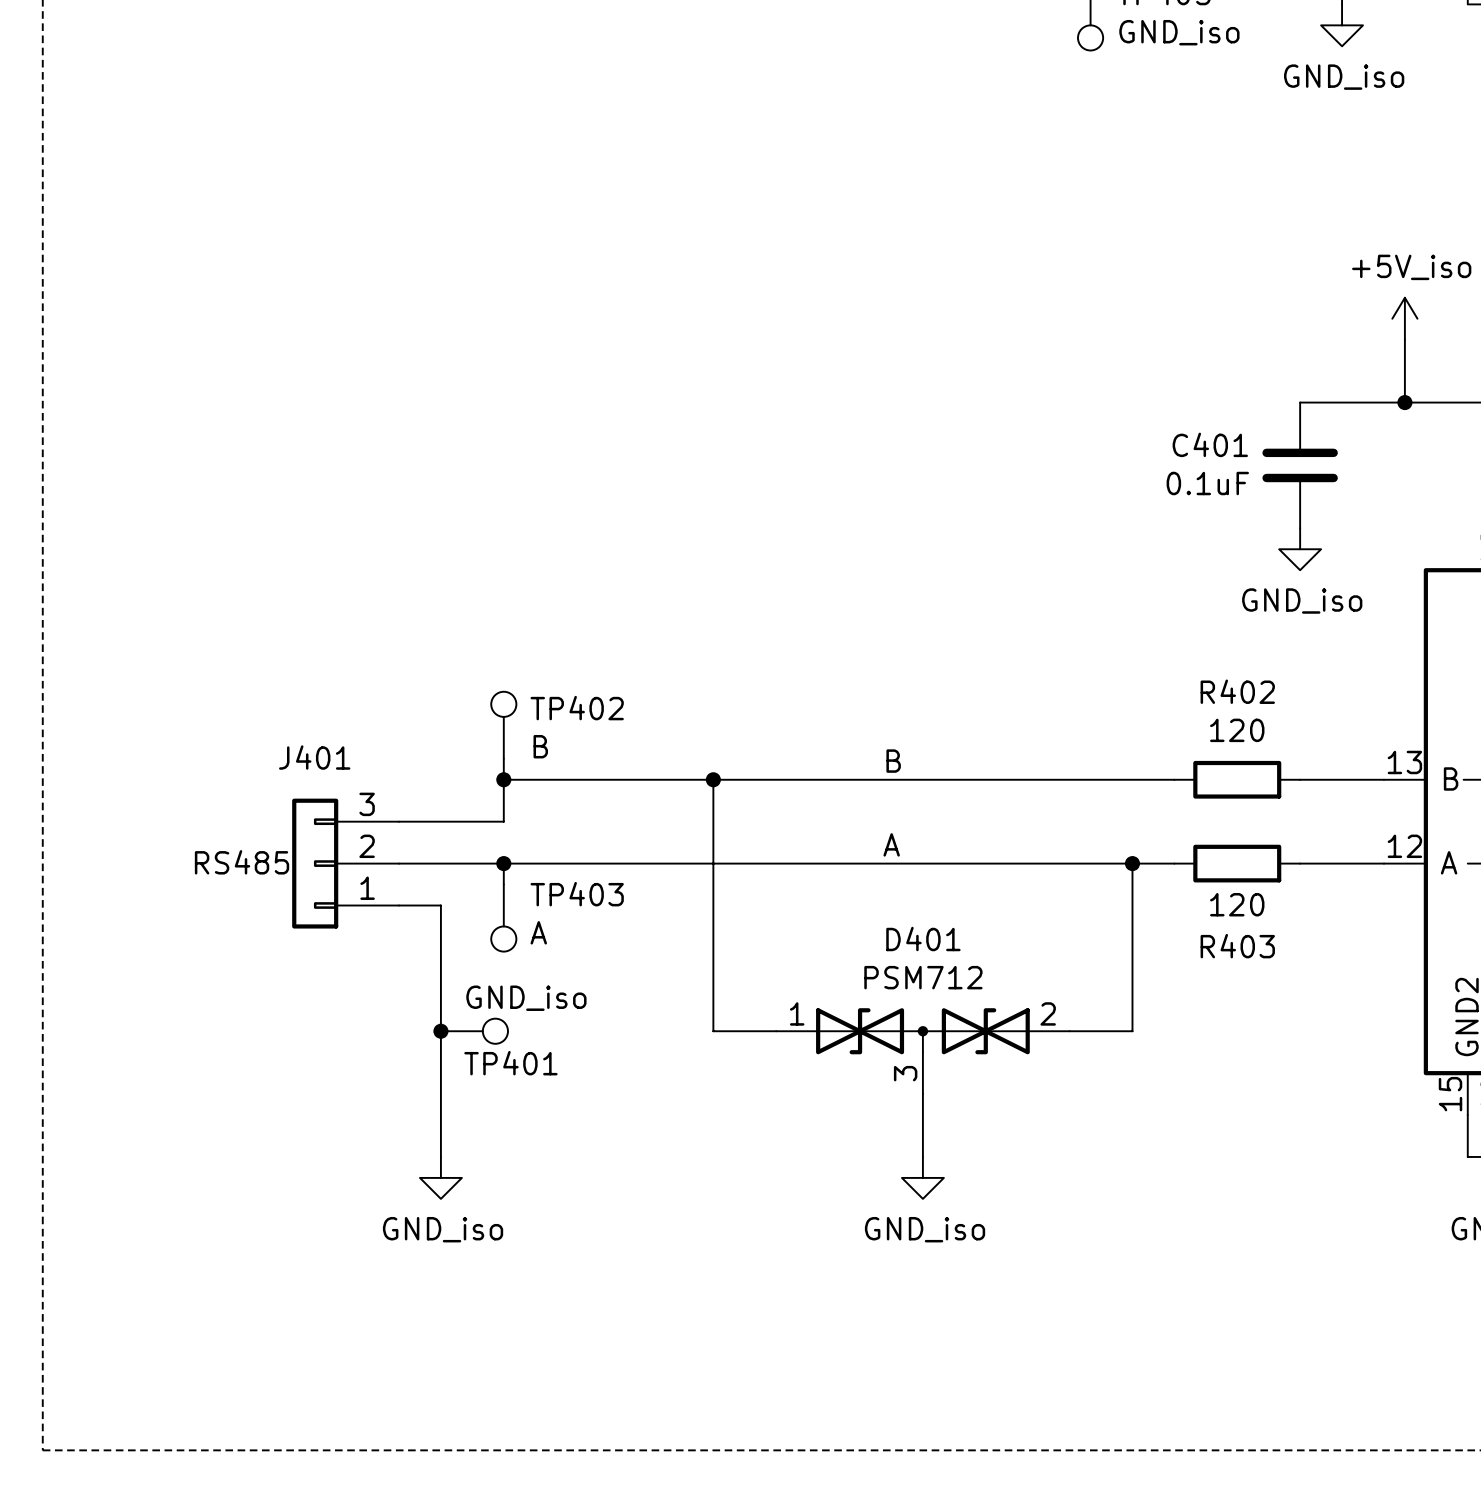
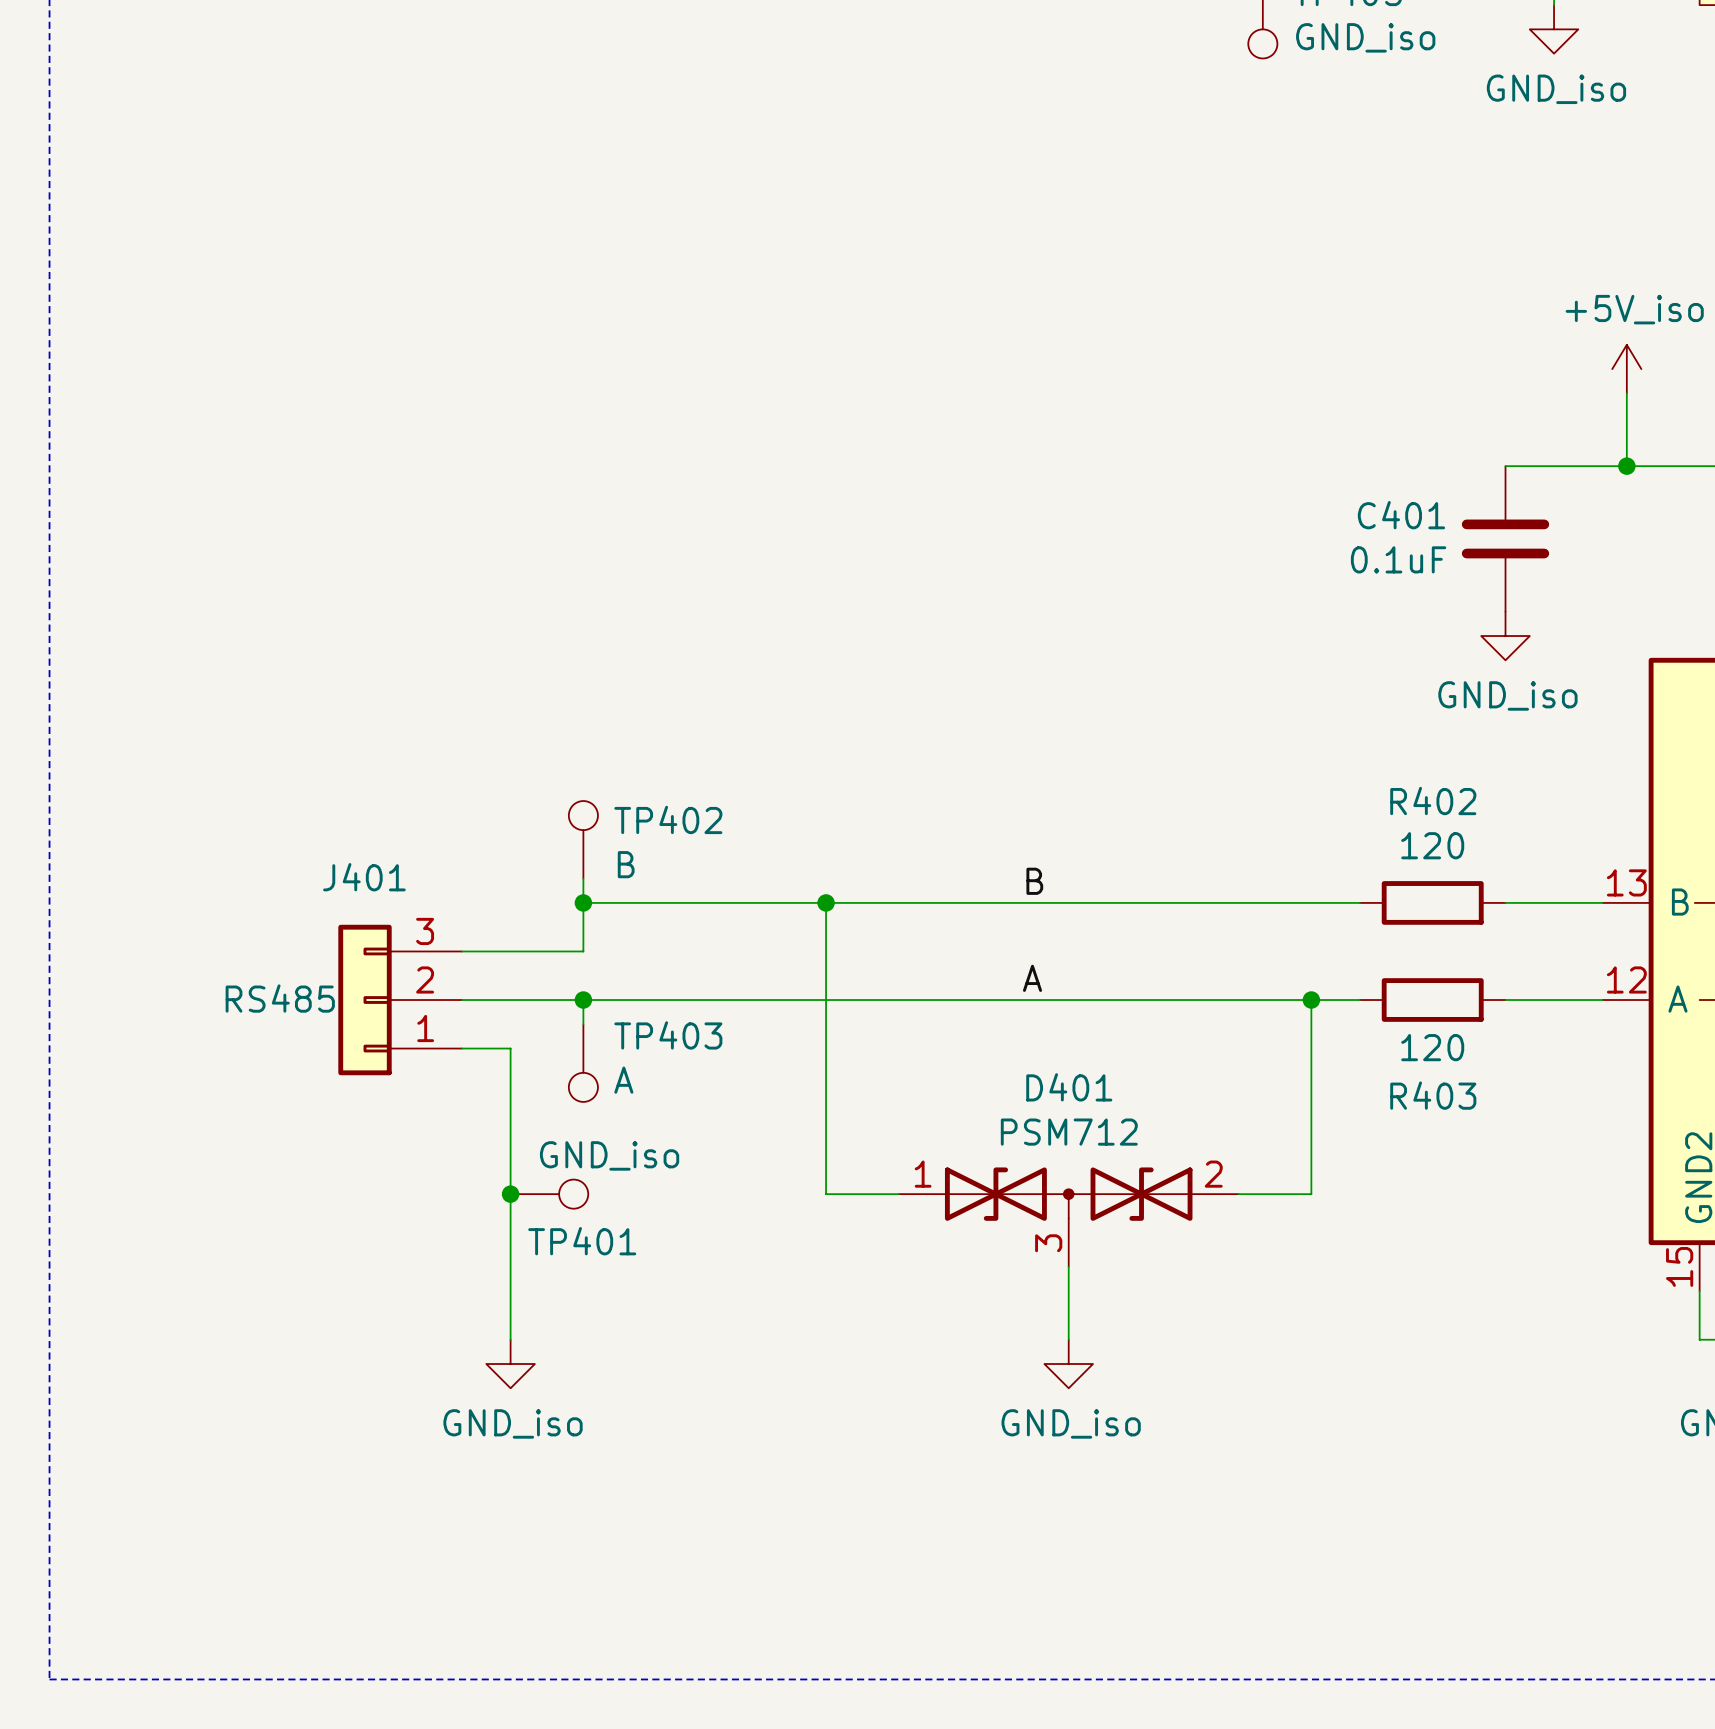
TP401 name position: TP401 (510, 1063) -> TP401 (582, 1241)

